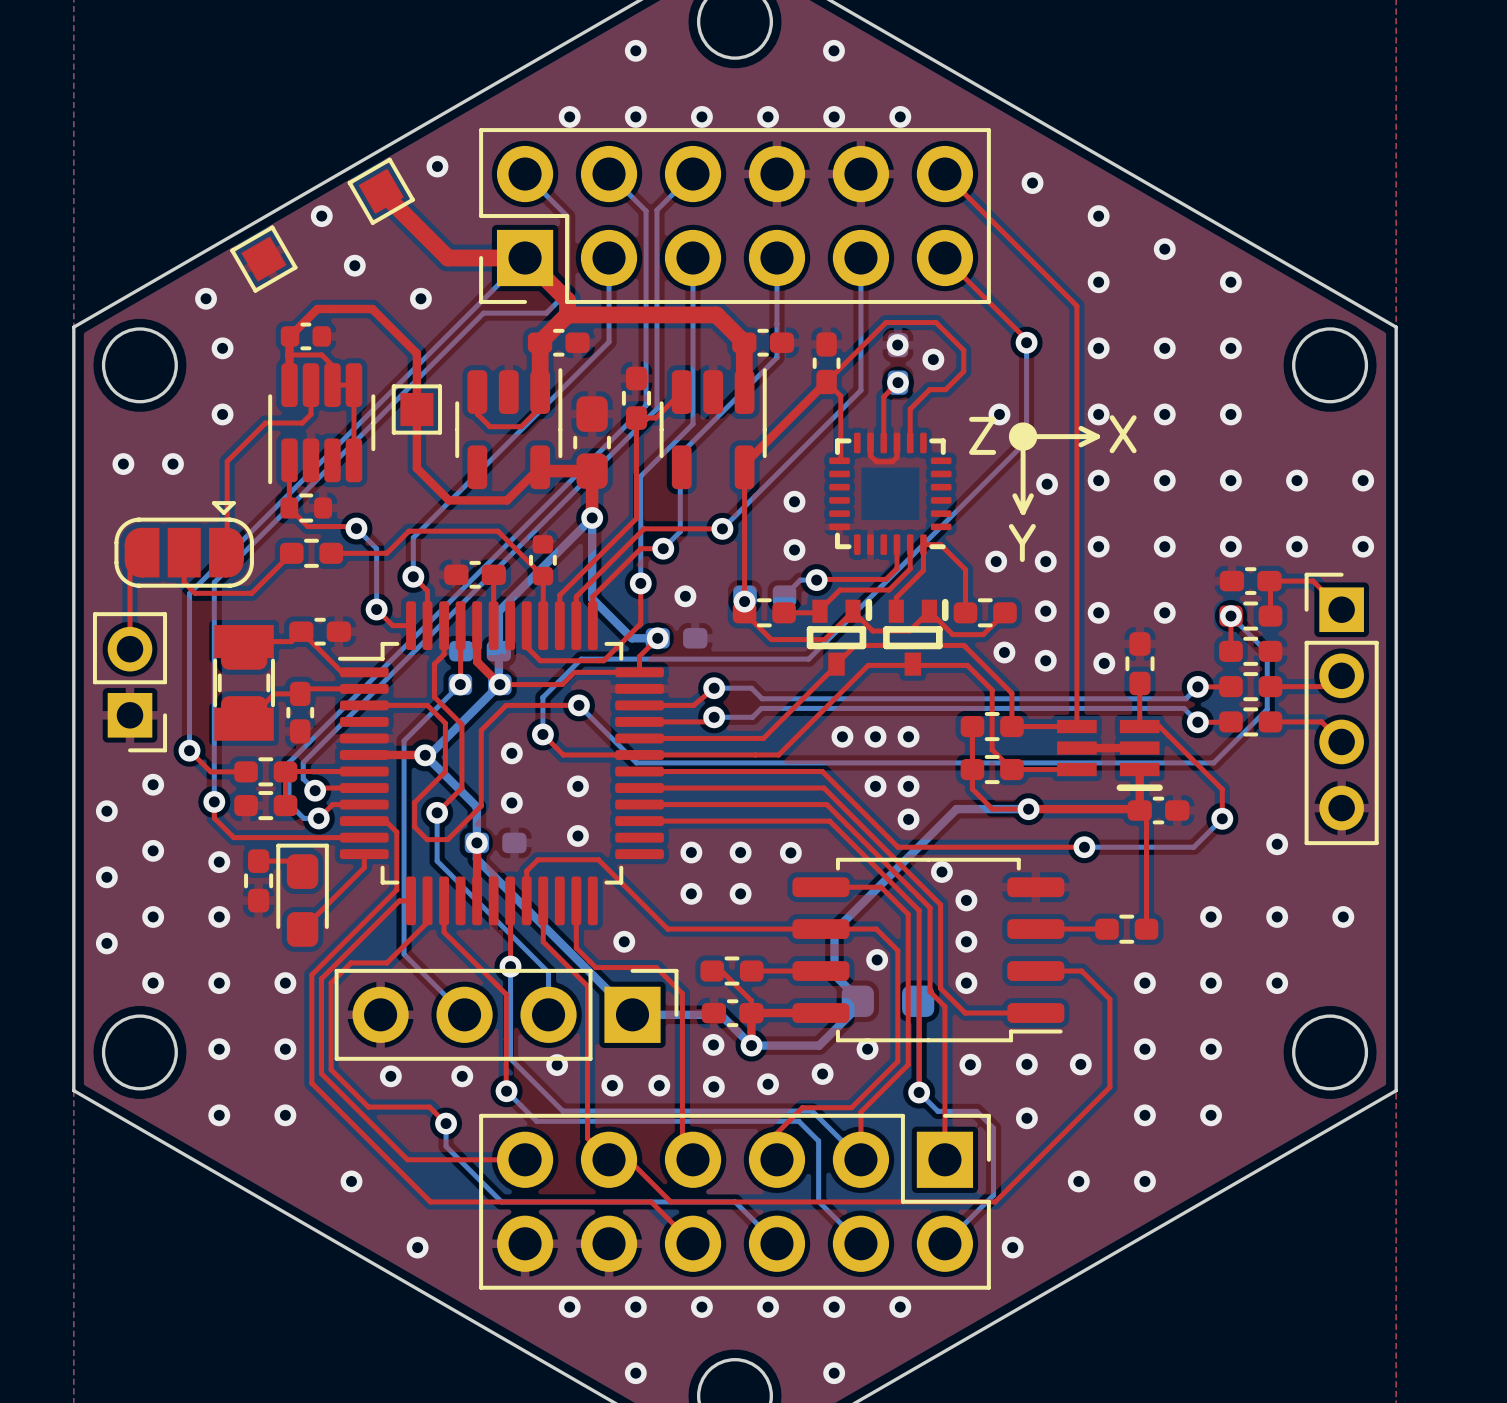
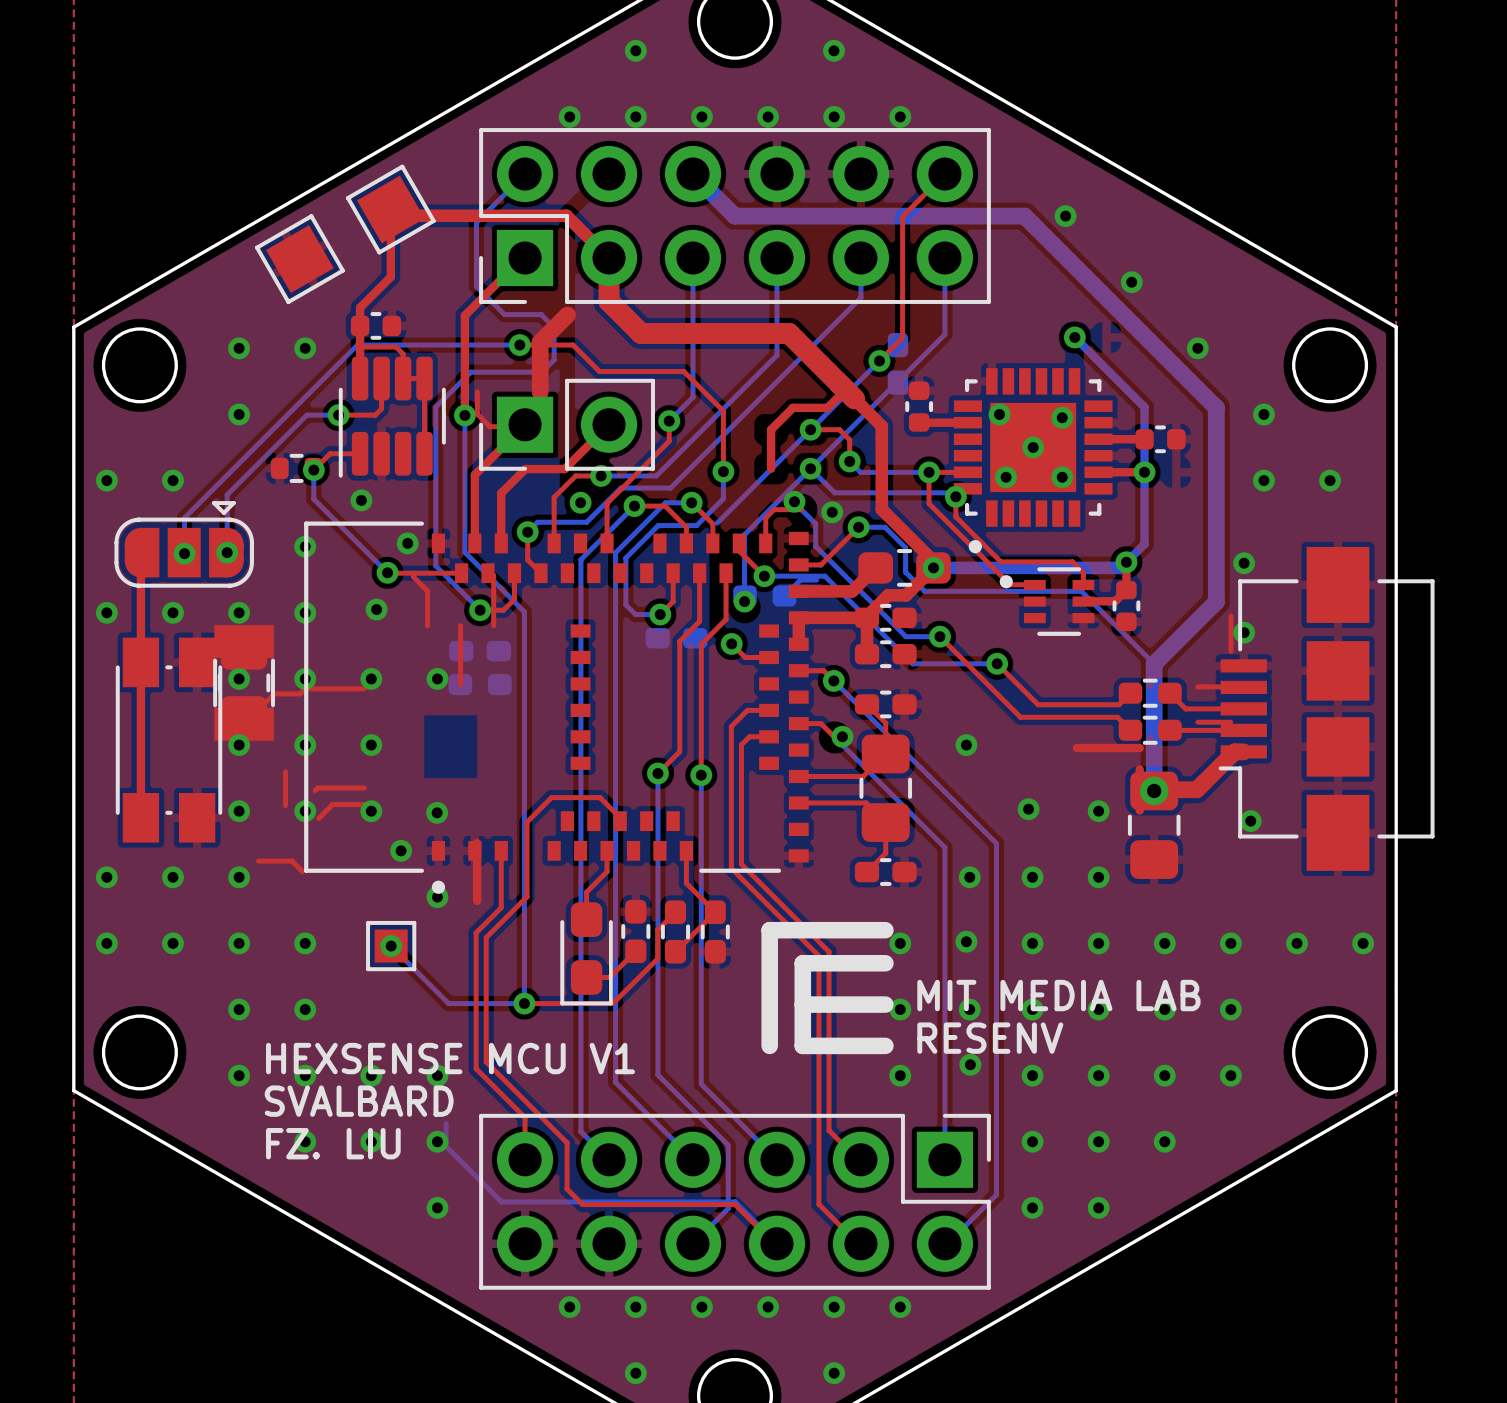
part footprint: [347, 157, 415, 225] -> [345, 164, 436, 255]
via: (437, 166) -> none
bottom track: (525, 174) (567, 216) (567, 291) (546, 313) (483, 313) (214, 582) (214, 801) -> (525, 174) (476, 222) (476, 286) (504, 314) (541, 314) (554, 327) (554, 359) (541, 372) (470, 372) (435, 407) (435, 565) (480, 610)
bottom track: (609, 174) (646, 211) (646, 405) (289, 762) (289, 803) (303, 818) (318, 818) -> none
bottom track: (693, 174) (656, 210) (656, 408) (303, 762) (303, 778) (315, 790) -> (693, 174) (734, 216) (1024, 216) (1216, 407) (1216, 601) (1154, 664)
top track: (944, 174) (1076, 306) (1076, 726) (1011, 726) (1011, 693) (963, 645) (855, 645) (836, 664) -> (944, 174) (902, 216) (902, 337) (879, 360)
via: (1032, 183) -> none
top track: (381, 191) (447, 257) (525, 257) (567, 300) (567, 314) (716, 314) (744, 342) (744, 391) -> none
via: (321, 216) -> none
via: none -> (1065, 216)
via: (1098, 216) -> none
via: (1164, 249) -> none
top track: none -> (525, 255) (464, 315) (464, 415)
top track: none -> (609, 255) (609, 301) (641, 333) (789, 333) (881, 426) (881, 509) (933, 561) (933, 567) (906, 595) (888, 595) (866, 616) (866, 654)
bottom track: none -> (944, 255) (944, 334) (744, 534) (744, 607)
bottom track: (525, 257) (189, 593) (189, 750) -> none
bottom track: (609, 257) (609, 342) (413, 537) (413, 576) -> none
top track: (944, 257) (1026, 339) (1026, 342) -> none
top track: none -> (609, 258) (566, 215) (397, 215) (390, 209) (390, 276) (360, 307) (360, 378)
part: (263, 259) -> none
part: none -> (299, 259)
via: (354, 265) -> none
via: (1098, 282) -> none
via: none -> (1131, 282)
via: (1230, 282) -> none
bottom track: (860, 297) (860, 390) (722, 528) -> (860, 297) (670, 488) (620, 488) (586, 522) (537, 522) (527, 532)
via: (206, 298) -> none
via: (420, 298) -> none
part position: (305, 336) -> (375, 325)
bottom track: none -> (1074, 337) (1144, 407) (1144, 544) (1120, 567) (933, 567)
via: none -> (1074, 337)
part: (558, 342) -> none
part: (763, 342) -> none
bottom track: (1026, 342) (1026, 441) (808, 659) (581, 659) (542, 697) (542, 734) -> none
via: (1026, 342) -> none
top track: none -> (519, 345) (573, 345) (599, 371) (683, 371) (723, 411) (723, 471)
bottom track: none -> (519, 345) (357, 345) (184, 517) (184, 553)
via: none -> (519, 345)
via: (897, 345) -> none
via position: (222, 348) -> (239, 348)
via: none -> (305, 348)
via: (1098, 348) -> none
via: (1164, 348) -> none
via: none -> (1197, 348)
via: (1230, 348) -> none
top track: none -> (360, 349) (362, 347) (396, 347) (403, 354) (403, 378) (424, 378) (424, 453)
top track: (289, 354) (321, 354) (332, 365) (332, 385) (353, 385) (353, 460) -> none
bottom track: (776, 355) (776, 357) (680, 454) (680, 531) (663, 548) -> (776, 355) (656, 475) (601, 475)
via: (933, 359) -> none
bottom track: none -> (879, 360) (717, 523)
via: none -> (879, 360)
part: (826, 363) -> none
top track: none -> (381, 378) (381, 408) (375, 415) (338, 415)
top track: (826, 381) (840, 396) (840, 460) -> none
top track: (826, 381) (885, 322) (936, 322) (963, 350) (963, 371) (945, 389) (929, 389) (910, 409) (910, 444) -> none
top track: (826, 381) (744, 463) (744, 612) (771, 639) (824, 639) (853, 611) (872, 631) (909, 631) (929, 611) (952, 634) (983, 634) (1005, 612) -> none
top track: (897, 382) (883, 396) (883, 444) -> none
via: (897, 382) -> none
part footprint: [391, 384, 443, 435] -> [338, 356, 446, 478]
top track: (289, 385) (289, 336) (317, 309) (372, 309) (416, 353) (416, 468) (449, 500) (507, 500) (540, 467) (543, 471) (592, 471) (592, 517) -> none
top track: (311, 385) (311, 414) (302, 423) (265, 423) (227, 461) (227, 552) -> none
top track: none -> (845, 389) (827, 407) (792, 407) (771, 429) (771, 468)
top track: (681, 392) (655, 418) (636, 418) (636, 518) (559, 595) (559, 625) -> none
bottom track: (693, 397) (693, 424) (640, 476) (640, 583) -> (693, 397) (669, 421)
part: (636, 398) -> none
part: none -> (919, 406)
via position: (222, 414) -> (239, 414)
via: (1098, 414) -> none
via: (1164, 414) -> none
via position: (1230, 414) -> (1263, 414)
bottom track: none -> (338, 415) (306, 415) (227, 494) (227, 552)
via: none -> (338, 415)
bottom track: none -> (464, 415) (464, 552) (524, 611) (524, 1003) (448, 1003) (391, 946)
via: none -> (464, 415)
via: none -> (1062, 417)
top track: none -> (669, 421) (669, 441) (607, 503) (607, 543)
via: none -> (669, 421)
top track: none -> (919, 422) (967, 422)
drawing: [1008, 422, 1038, 451] -> none
part: (321, 423) -> none
top track: none -> (525, 424) (474, 475) (474, 543)
part: none -> (567, 424)
top track: none -> (609, 424) (564, 469) (525, 469) (501, 493) (501, 543)
part: (508, 428) -> none
part: (713, 428) -> none
line: (1080, 428) (1097, 436) -> none
top track: none -> (810, 429) (839, 429) (849, 439) (849, 461)
via: none -> (810, 429)
text: X (1123, 434) -> none
text: Z (982, 435) -> none
line: (1097, 436) (1080, 444) -> none
line: (1097, 436) (1023, 436) (1023, 512) -> none
top track: none -> (1098, 439) (1144, 439)
part: none -> (1160, 439)
part: (592, 442) -> none
top track: (870, 442) (870, 455) (876, 461) (892, 461) (896, 457) (896, 442) -> none
via: none -> (1033, 447)
top track: none -> (360, 453) (330, 453) (313, 470)
top track: (289, 460) (289, 508) (307, 526) (354, 526) (356, 528) -> none
part: none -> (1033, 460)
bottom track: none -> (849, 461) (860, 472) (929, 472)
via: none -> (849, 461)
via position: (123, 464) -> (106, 480)
via position: (172, 464) -> (172, 480)
bottom track: none -> (810, 468) (834, 492) (951, 492) (955, 496)
via: none -> (810, 468)
bottom track: none -> (313, 470) (313, 499) (387, 572)
via: none -> (313, 470)
bottom track: none -> (723, 471) (723, 498) (696, 525) (658, 525) (625, 557) (625, 604) (635, 614) (660, 614)
via: none -> (723, 471)
via: none -> (929, 472)
top track: none -> (967, 472) (929, 472) (929, 503) (1010, 584) (1035, 584)
top track: none -> (1098, 472) (1144, 472)
top track: none -> (601, 475) (575, 475) (554, 497) (554, 543)
via: none -> (601, 475)
via: none -> (1006, 477)
via: (1098, 480) -> none
via position: (1164, 480) -> (1144, 472)
via: (1230, 480) -> none
via: none -> (1263, 480)
via: (1297, 480) -> none
via: none -> (1330, 480)
via: (1363, 480) -> none
via position: (1047, 484) -> (1062, 477)
part: (890, 493) -> none
line: (1014, 495) (1023, 512) -> none
line: (1031, 495) (1023, 512) -> none
top track: none -> (955, 496) (955, 516) (1000, 561) (1072, 561) (1083, 572) (1083, 585)
via: none -> (955, 496)
via: none -> (361, 500)
top track: none -> (691, 502) (712, 523) (712, 543)
bottom track: none -> (691, 502) (665, 502) (615, 552) (615, 1082) (693, 1159)
via: none -> (691, 502)
top track: none -> (634, 506) (665, 506) (686, 527) (686, 543)
bottom track: none -> (634, 506) (580, 559) (580, 1131) (609, 1159)
via: none -> (634, 506)
part position: (306, 508) -> (296, 468)
top track: none -> (801, 509) (774, 509) (765, 517) (765, 543)
bottom track: none -> (801, 509) (815, 523) (815, 546) (905, 636) (939, 636)
via: none -> (832, 512)
via position: (592, 517) -> (580, 502)
top track: none -> (858, 527) (820, 564) (798, 564)
bottom track: none -> (858, 527) (885, 527) (905, 547) (905, 572) (924, 591) (1081, 591) (1154, 664)
via: none -> (858, 527)
bottom track: (356, 528) (376, 548) (376, 609) -> none
via: (356, 528) -> none
top track: (722, 528) (644, 528) (576, 596) (576, 625) -> none
via: (722, 528) -> none
top track: none -> (527, 532) (527, 559) (540, 573)
via: none -> (527, 532)
text: Y (1022, 542) -> none
via: none -> (407, 543)
top track: none -> (739, 543) (739, 551) (764, 576)
top track: (910, 543) (910, 568) (889, 590) (839, 590) (817, 612) (784, 612) -> none
top track: (896, 544) (896, 568) (885, 579) (816, 580) -> none
via: none -> (305, 546)
via: (1098, 546) -> none
via: (1164, 546) -> none
via position: (1230, 546) -> (1244, 563)
via: (1297, 546) -> none
via: (1363, 546) -> none
top track: (663, 548) (640, 548) (592, 596) (592, 625) -> none
via: (663, 548) -> none
via: (794, 550) -> none
top track: (141, 552) (130, 563) (130, 649) -> (140, 552) (140, 817)
top track: (184, 552) (184, 582) (195, 593) (251, 593) (291, 553) -> none
via: none -> (227, 552)
via: none -> (184, 553)
part: (311, 553) -> none
top track: (331, 553) (386, 553) (409, 531) (497, 531) (543, 576) (543, 625) -> none
part: (542, 560) -> none
via: (996, 561) -> none
via: (1045, 561) -> none
top track: none -> (1126, 562) (1126, 590) (1115, 601) (1083, 601)
via: none -> (1126, 562)
top track: none -> (875, 567) (852, 591) (798, 591)
part: none -> (904, 567)
via: none -> (933, 567)
via: none -> (387, 572)
part footprint: [1304, 572, 1379, 846] -> [1218, 546, 1435, 871]
top track: none -> (387, 573) (461, 573)
top track: none -> (514, 573) (514, 599) (503, 610) (480, 610)
top track: none -> (673, 573) (673, 601) (660, 614)
top track: none -> (699, 573) (699, 621) (679, 641) (679, 751) (657, 773)
top track: none -> (726, 573) (726, 619) (701, 644) (701, 775)
part: (475, 574) -> none
via: (413, 576) -> none
bottom track: none -> (764, 576) (824, 576) (912, 663) (997, 663)
via: none -> (764, 576)
via: (816, 580) -> none
part: (1250, 581) -> none
top track: (640, 583) (640, 623) (603, 660) (540, 660) (526, 647) (526, 625) -> none
via: (640, 583) -> none
via: (685, 596) -> none
part: none -> (1047, 601)
part: none -> (1126, 605)
top track: (376, 609) (392, 625) (411, 625) -> none
top track: (1341, 609) (1313, 581) (1269, 581) (1270, 616) -> none
via: none -> (480, 610)
top track: (896, 611) (896, 597) (923, 570) (923, 544) (940, 544) (965, 569) (965, 612) -> none
via: (1045, 611) -> none
via: none -> (106, 612)
via: none -> (172, 612)
via: none -> (239, 612)
via: none -> (305, 612)
part: (764, 612) -> none
part: (985, 612) -> none
via: (1098, 612) -> none
via: (1164, 612) -> none
via: none -> (660, 614)
bottom track: (1230, 616) (1267, 652) (1267, 709) (1213, 762) (636, 762) (578, 705) -> none
via position: (1230, 616) -> (1244, 632)
part: (1250, 616) -> none
top track: none -> (866, 617) (798, 617) (798, 644)
part: none -> (885, 617)
top track: (444, 625) (444, 654) (434, 664) (434, 697) (461, 724) (461, 788) (437, 812) -> none
top track: (477, 625) (477, 661) (499, 684) (562, 684) (574, 672) (639, 672) (639, 656) (657, 638) -> none
part: (320, 631) -> none
top track: none -> (939, 636) (1020, 717) (1117, 717) (1130, 730)
via: none -> (939, 636)
part: (839, 637) -> none
part: (915, 637) -> none
bottom track: (657, 638) (631, 638) (592, 598) (592, 517) (498, 611) (499, 684) (429, 755) (425, 755) (476, 806) (476, 859) (632, 1014) (720, 1014) (751, 1045) (819, 1045) (862, 1002) (834, 974) (834, 931) (956, 809) (1027, 809) -> none
via: (657, 638) -> none
top track: (244, 641) (291, 641) (301, 631) (342, 672) (364, 672) -> none
top track: none -> (731, 643) (745, 657) (769, 657)
via: none -> (731, 643)
part: (1250, 651) -> none
via position: (1004, 652) -> (997, 663)
via: (1045, 660) -> none
top track: none -> (997, 663) (1038, 704) (1118, 704) (1130, 693)
via: (1104, 663) -> none
part rotation: 0° (1139, 663) -> 90° clockwise (1150, 693)
bottom track: none -> (1154, 664) (1154, 790)
top track: (836, 665) (763, 738) (639, 738) -> none
top track: none -> (798, 670) (823, 670) (833, 680)
top track: (1341, 675) (1330, 686) (1270, 686) -> none
via: none -> (239, 678)
via: none -> (305, 678)
via: none -> (371, 678)
bottom track: none -> (833, 680) (996, 843) (996, 1194) (944, 1246)
via: none -> (833, 680)
part: (130, 682) -> none
top track: (1139, 683) (1139, 726) (1159, 726) (1222, 789) (1222, 818) -> none
bottom track: (460, 684) (404, 740) (404, 954) (464, 1014) -> none
via position: (460, 684) -> (437, 678)
via: (499, 684) -> none
bottom track: (1197, 686) (1185, 698) (762, 698) (751, 688) (714, 688) -> none
via: (1197, 686) -> none
part: (1250, 686) -> none
top track: (714, 688) (693, 705) (639, 705) -> none
via: (714, 688) -> none
top track: none -> (1169, 693) (1185, 708) (1243, 708)
top track: none -> (866, 704) (885, 723) (885, 753) (863, 776) (798, 776)
part: none -> (885, 704)
top track: (364, 705) (427, 705) (445, 723) (445, 771) (414, 802) (414, 827) (427, 839) (447, 839) (481, 806) (481, 730) (506, 705) (578, 705) -> none
via: (578, 705) -> none
part: none -> (556, 707)
top track: none -> (769, 710) (747, 710) (731, 726) (731, 868) (818, 955) (818, 1204) (860, 1246)
part: (300, 712) -> none
top track: (714, 717) (709, 721) (639, 721) -> none
bottom track: (714, 717) (752, 717) (761, 708) (1184, 708) (1197, 722) -> none
via: (714, 717) -> none
part: (1250, 721) -> none
top track: (1270, 721) (1321, 721) (1341, 741) -> none
via: (1197, 722) -> none
top track: none -> (798, 723) (821, 723) (834, 737)
top track: (972, 726) (972, 789) (992, 809) (1138, 809) (1146, 817) (1146, 929) -> none
part: (992, 726) -> none
part: none -> (1150, 730)
top track: none -> (1170, 730) (1243, 730)
top track: (542, 734) (563, 754) (778, 754) (868, 665) (967, 665) (992, 690) (992, 749) (1011, 769) (1076, 769) -> none
via: (542, 734) -> none
top track: none -> (769, 736) (749, 736) (741, 744) (741, 864) (829, 951) (829, 1130) (860, 1162)
via: (875, 736) -> none
via: (908, 736) -> none
bottom track: none -> (834, 737) (944, 847) (944, 1162)
part: none -> (169, 740)
via: none -> (239, 745)
via: none -> (305, 745)
via: none -> (371, 745)
via: none -> (966, 745)
top track: (189, 750) (210, 771) (246, 771) -> none
via: (189, 750) -> none
top track: none -> (1243, 751) (1234, 751) (1196, 789) (1154, 790)
via: (511, 753) -> none
top track: (364, 754) (424, 754) -> none
via: (425, 755) -> none
part: (1109, 755) -> none
part: (500, 763) -> none
part: (992, 769) -> none
part: (265, 771) -> none
top track: (285, 771) (364, 771) -> none
top track: (639, 771) (822, 771) (897, 847) (1084, 847) -> none
bottom track: none -> (657, 773) (657, 1074) (728, 1145) (728, 1208) (693, 1243)
via: none -> (657, 773)
bottom track: none -> (701, 775) (701, 1084) (776, 1159)
via: none -> (701, 775)
via: (153, 784) -> none
via: (577, 786) -> none
via: (875, 786) -> none
via: (908, 786) -> none
top track: (639, 788) (823, 788) (940, 904) (940, 988) (965, 1013) (1040, 1013) -> none
part: none -> (885, 788)
via: (315, 790) -> none
via: none -> (1154, 790)
part footprint: [1127, 796, 1190, 825] -> [1127, 771, 1181, 879]
top track: (214, 801) (214, 818) (233, 837) (364, 837) -> none
via position: (214, 801) -> (239, 811)
via: (511, 802) -> none
top track: none -> (798, 802) (866, 802) (885, 822) (885, 853) (866, 872)
top track: (639, 804) (826, 804) (930, 907) (930, 991) (944, 1006) (944, 1159) -> none
part: (265, 805) -> none
via: (106, 811) -> none
via: none -> (305, 811)
via: none -> (371, 811)
via: none -> (1098, 811)
bottom track: (437, 812) (437, 861) (548, 972) (548, 1014) -> none
via: (318, 818) -> none
bottom track: (1222, 818) (1193, 847) (1084, 847) -> none
via: (1222, 818) -> none
via: (908, 819) -> none
top track: (364, 821) (385, 821) (396, 832) (396, 889) (311, 974) (311, 1083) (430, 1201) (651, 1201) (693, 1243) -> none
top track: none -> (620, 821) (620, 817) (600, 797) (551, 797) (527, 822) (527, 896) (486, 937) (486, 1061) (567, 1142) (567, 1189) (582, 1204) (735, 1204) (776, 1246)
top track: (639, 821) (829, 821) (919, 910) (919, 1092) -> none
via: none -> (1250, 821)
via: (577, 835) -> none
via: (476, 842) -> none
part side: bottom (495, 842) -> top (885, 654)
via: (1277, 844) -> none
via: (1084, 847) -> none
via: (153, 850) -> none
via: none -> (401, 850)
top track: none -> (501, 850) (501, 907) (476, 932) (476, 1068) (525, 1117) (525, 1162)
top track: none -> (607, 850) (607, 871) (586, 892) (586, 919)
top track: none -> (686, 850) (686, 883) (715, 912) (675, 951)
via: (691, 852) -> none
via: (740, 852) -> none
via: (790, 852) -> none
top track: (364, 854) (364, 867) (302, 929) -> none
via position: (219, 862) -> (239, 877)
part: none -> (885, 872)
via: (941, 872) -> none
via: none -> (172, 877)
via: none -> (969, 877)
via: none -> (1032, 877)
via: none -> (1098, 877)
part: (258, 880) -> none
top track: (815, 887) (881, 887) (908, 914) (908, 1064) (860, 1112) (860, 1159) -> none
via: (691, 893) -> none
via: (740, 893) -> none
part rotation: 0° (302, 895) -> 180° (586, 953)
part position: (302, 895) -> (586, 953)
via: none -> (437, 897)
top track: (411, 900) (399, 900) (321, 978) (321, 1073) (407, 1159) (525, 1159) -> none
top track: (427, 900) (427, 922) (386, 962) (351, 962) (331, 982) (331, 1069) (368, 1107) (429, 1107) (446, 1123) -> none
top track: (444, 900) (444, 932) (506, 994) (506, 1090) -> none
top track: (526, 900) (526, 871) (537, 859) (598, 859) (667, 929) (808, 929) -> none
top track: (543, 900) (543, 941) (587, 986) (587, 1138) (609, 1159) (628, 1159) (670, 1201) (995, 1201) (1109, 1087) (1109, 999) (1081, 971) (1047, 971) -> none
top track: (576, 900) (576, 948) (595, 967) (656, 967) (682, 993) (682, 1149) (693, 1159) -> none
via: (966, 900) -> none
top track: (510, 901) (510, 966) -> none
top track: none -> (675, 912) (657, 929) (657, 958) (612, 1003) (524, 1003)
via: (153, 916) -> none
via: (219, 916) -> none
via: (1211, 916) -> none
via: (1277, 916) -> none
via: (1343, 916) -> none
top track: (815, 929) (876, 929) (897, 950) (897, 1061) (851, 1107) (802, 1107) (776, 1133) (776, 1159) -> none
top track: (1047, 929) (1106, 929) -> none
part: (1126, 929) -> none
line: none -> (885, 930) (769, 930) (769, 1045)
part: none -> (635, 931)
part: none -> (675, 931)
part: none -> (715, 931)
via: (624, 941) -> none
via: none -> (172, 943)
via: none -> (239, 943)
via: none -> (305, 943)
via: none -> (900, 943)
via: none -> (1032, 943)
via: none -> (1098, 943)
via: none -> (1164, 943)
via: none -> (1230, 943)
via: none -> (1297, 943)
via: none -> (1363, 943)
part: none -> (391, 946)
via: none -> (391, 946)
part: (928, 950) -> none
top track: none -> (635, 951) (609, 977) (586, 977)
via: (877, 959) -> none
line: none -> (885, 963) (802, 963) (802, 1045) (885, 1045)
bottom track: (510, 966) (510, 1058) (562, 1111) (812, 1111) (860, 1159) -> none
via: (510, 966) -> none
top track: (712, 971) (721, 971) (751, 1000) (751, 1045) -> none
part: (732, 971) -> none
top track: (751, 971) (808, 971) -> none
via: (153, 983) -> none
via: (219, 983) -> none
via: (285, 983) -> none
via position: (966, 983) -> (969, 1009)
via: (1144, 983) -> none
via: (1211, 983) -> none
via: (1277, 983) -> none
text: none -> MIT MEDIA LAB (1058, 995)
part: (887, 1001) -> none
bottom track: (919, 1002) (919, 1092) (937, 1111) (976, 1111) (993, 1128) (993, 1195) (944, 1243) -> none
via: none -> (524, 1003)
line: none -> (802, 1004) (885, 1004)
via: none -> (239, 1009)
via: none -> (305, 1009)
via: none -> (900, 1009)
via: none -> (1032, 1009)
via: none -> (1098, 1009)
via: none -> (1164, 1009)
via: none -> (1230, 1009)
part: (732, 1013) -> none
top track: (751, 1013) (808, 1013) -> none
part: (506, 1014) -> none
text: none -> RESENV (990, 1038)
via: (713, 1044) -> none
via: (751, 1045) -> none
via: (219, 1049) -> none
via: (285, 1049) -> none
via: (867, 1049) -> none
via: (1144, 1049) -> none
via: (1211, 1049) -> none
text: none -> HEXSENSE MCU V1 (450, 1058)
via position: (1026, 1064) -> (1032, 1075)
via position: (1080, 1064) -> (1098, 1075)
via: (557, 1065) -> none
via: (822, 1074) -> none
via: none -> (239, 1075)
via: none -> (305, 1075)
via: none -> (437, 1075)
via: none -> (1164, 1075)
via: none -> (1230, 1075)
via position: (390, 1076) -> (371, 1075)
via: (462, 1076) -> none
via: (768, 1084) -> none
via: (612, 1085) -> none
via: (659, 1085) -> none
via: (713, 1086) -> none
bottom track: (506, 1091) (536, 1121) (798, 1121) (818, 1141) (818, 1201) (860, 1243) -> none
via: (506, 1091) -> none
via position: (919, 1092) -> (900, 1075)
text: none -> SVALBARD (359, 1101)
via: (219, 1115) -> none
via: (285, 1115) -> none
via: (1144, 1115) -> none
via: (1211, 1115) -> none
via: (1026, 1118) -> none
via position: (446, 1123) -> (437, 1141)
via: none -> (305, 1141)
via: none -> (371, 1141)
via: none -> (1032, 1141)
via: none -> (1098, 1141)
via: none -> (1164, 1141)
text: none -> FZ. LIU (333, 1143)
via: (351, 1181) -> none
via: (1078, 1181) -> none
via: (1144, 1181) -> none
via: none -> (437, 1207)
via: none -> (1032, 1207)
via: none -> (1098, 1207)
via: (417, 1247) -> none
via: (1012, 1247) -> none

